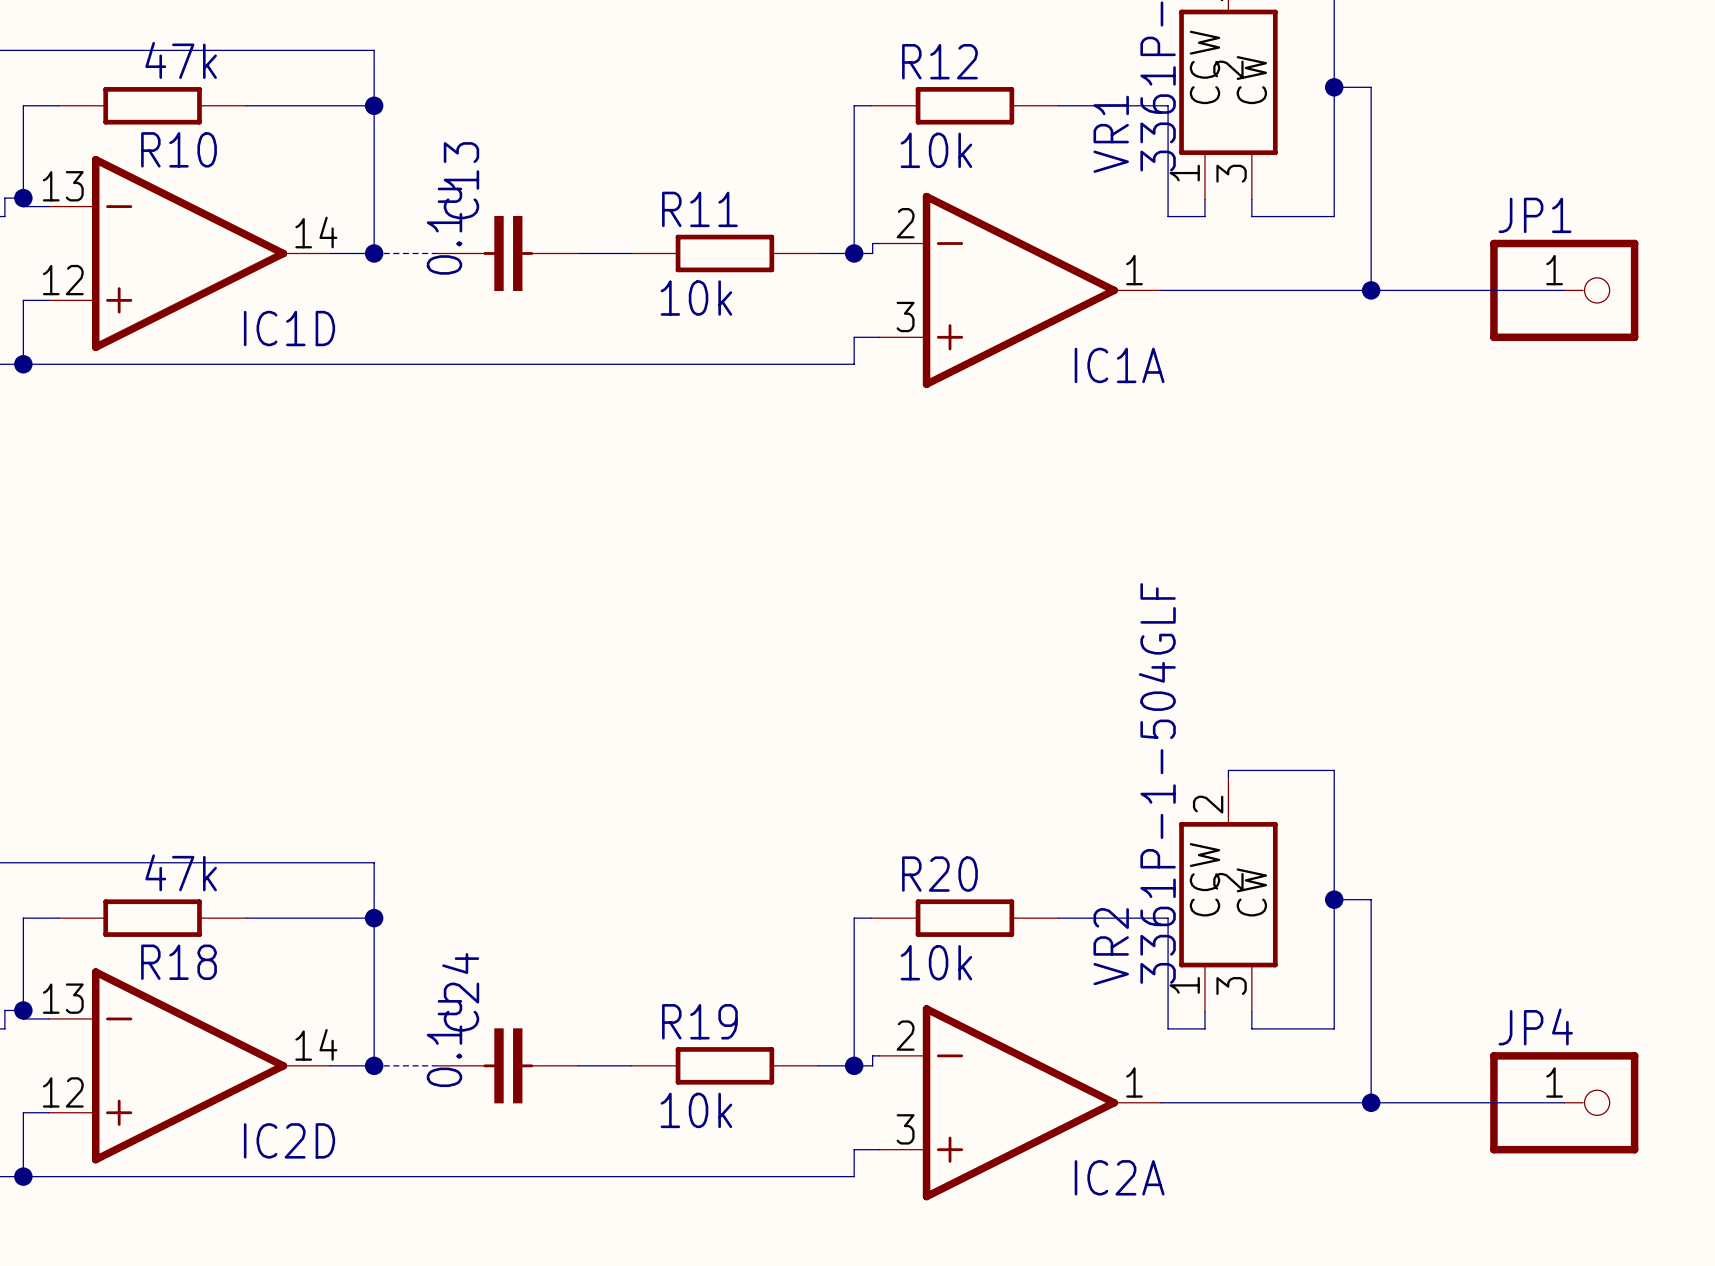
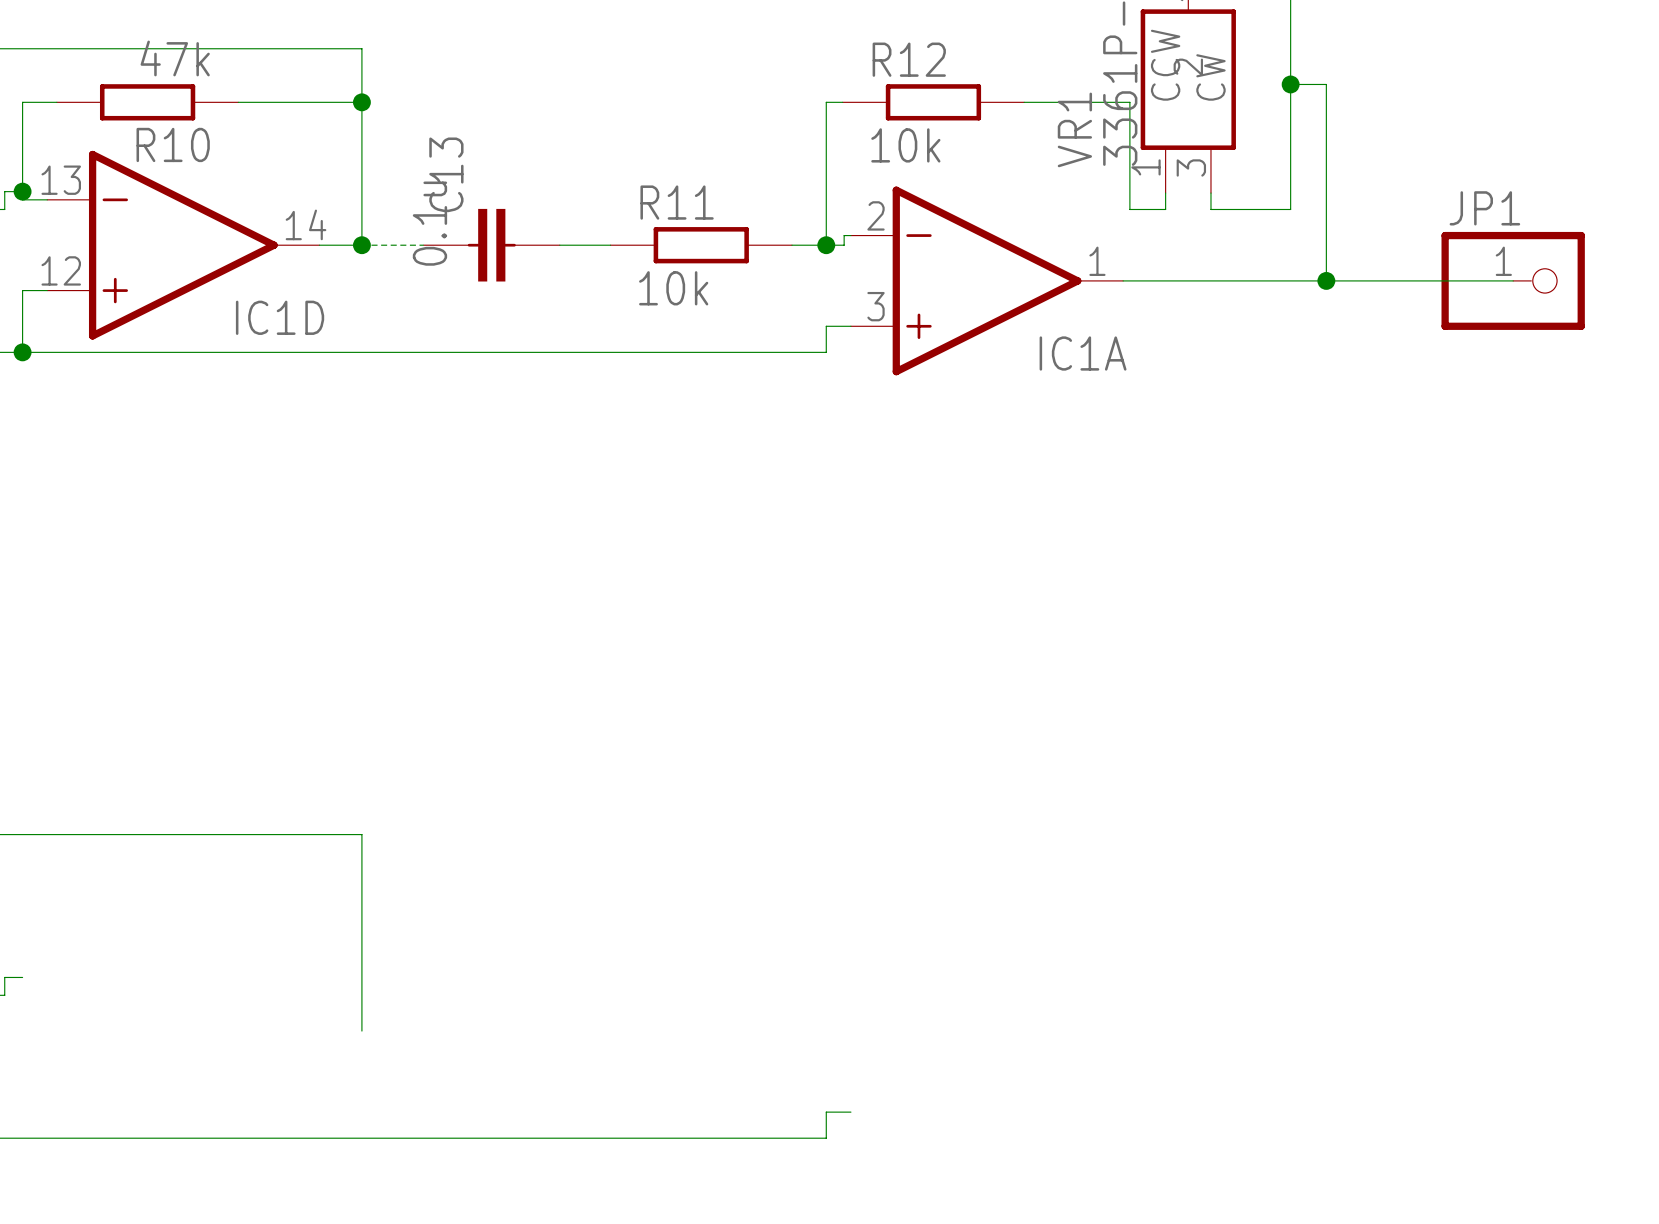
wire: (1228, 777) (1228, 770) (1334, 770) (1334, 1028) (1251, 1028) (1251, 1011) -> none
VR2: 3361P-1-504GLF (1228, 894) -> none
wire: (1334, 899) (1371, 899) (1371, 1102) -> none
junction: (1334, 899) -> none
wire: (58, 918) (23, 918) (23, 1018) (48, 1018) -> none
R18: 47k (152, 918) -> none
wire: (246, 918) (374, 918) -> none
junction: (374, 918) -> none
wire: (871, 918) (854, 918) (854, 1065) -> none
R20: 10k (964, 918) -> none
wire: (1058, 918) (1168, 918) (1168, 1028) (1204, 1028) (1204, 1011) -> none
junction: (23, 1010) -> none
wire: (879, 1055) (872, 1055) (872, 1065) (818, 1065) -> none
IC2D: (189, 1065) -> none
wire: (330, 1065) (438, 1065) -> none
junction: (374, 1065) -> none
C24: 0.1u (508, 1065) -> none
wire: (578, 1065) (631, 1065) -> none
R19: 10k (724, 1065) -> none
junction: (854, 1065) -> none
IC2A: (1020, 1102) -> none
wire: (1161, 1102) (1564, 1102) -> none
junction: (1371, 1102) -> none
JP4: (1564, 1102) -> none
wire: (48, 1112) (23, 1112) (23, 1176) -> none
junction: (23, 1176) -> none

